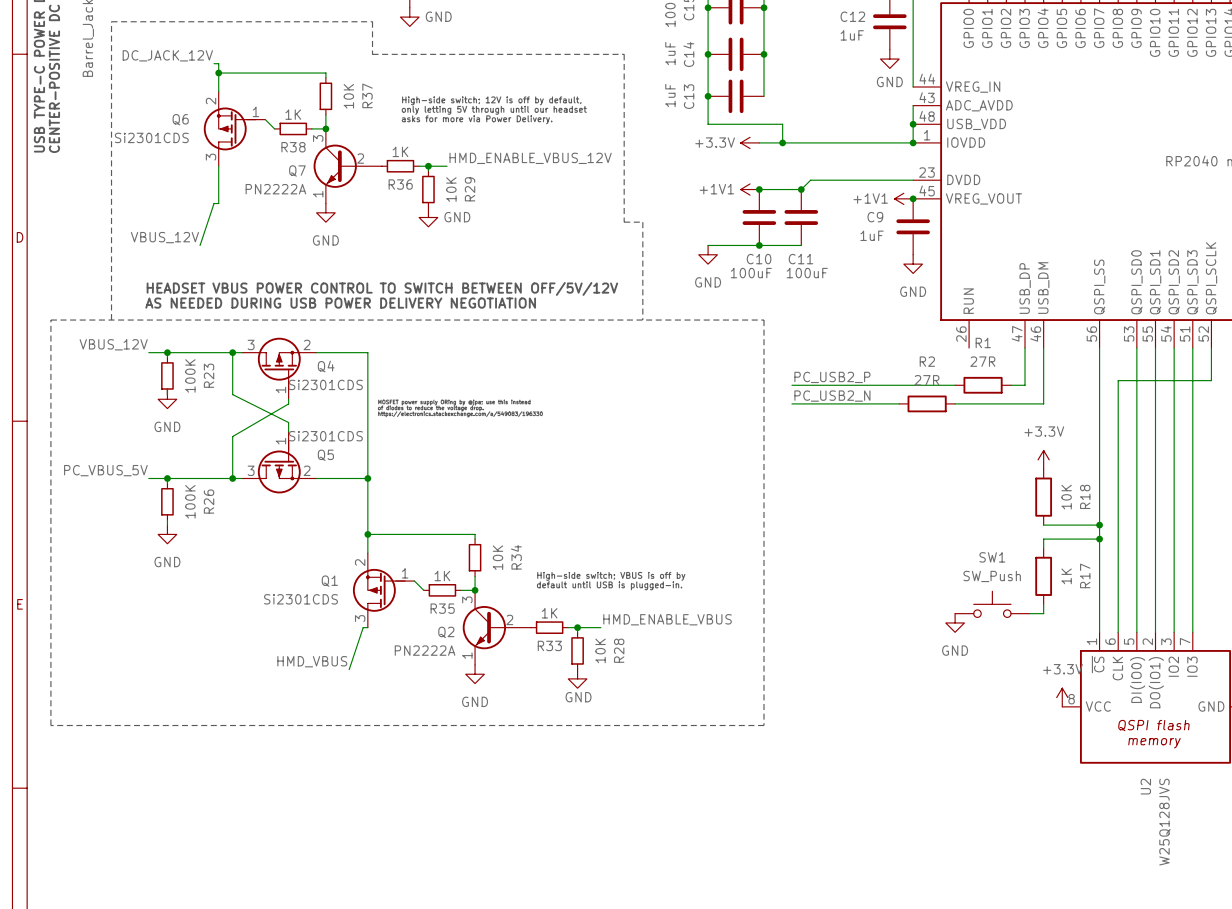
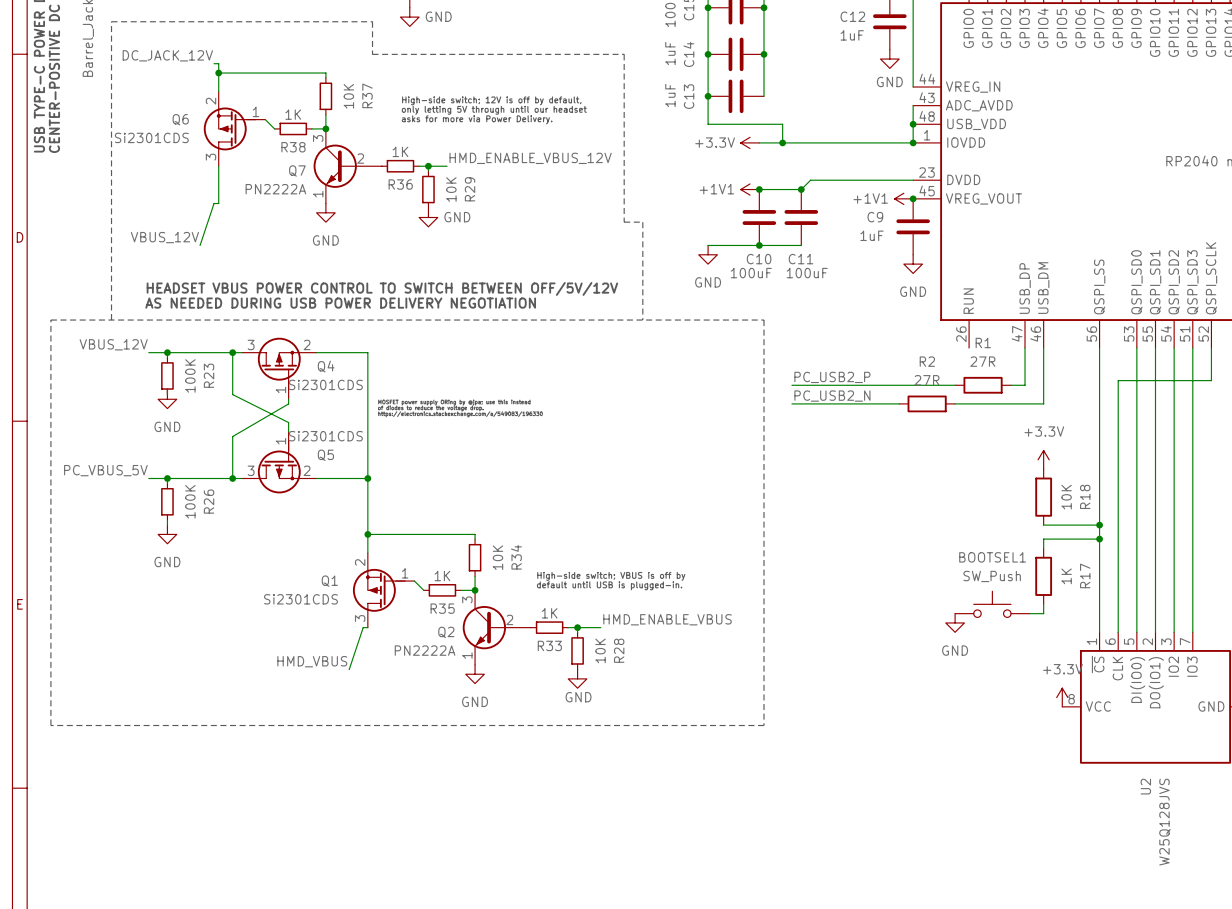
SW1 name: SW1 (992, 557) -> BOOTSEL1 (992, 557)
U2 text: QSPI flash (1153, 725) -> none
U2 text: memory (1154, 743) -> none

